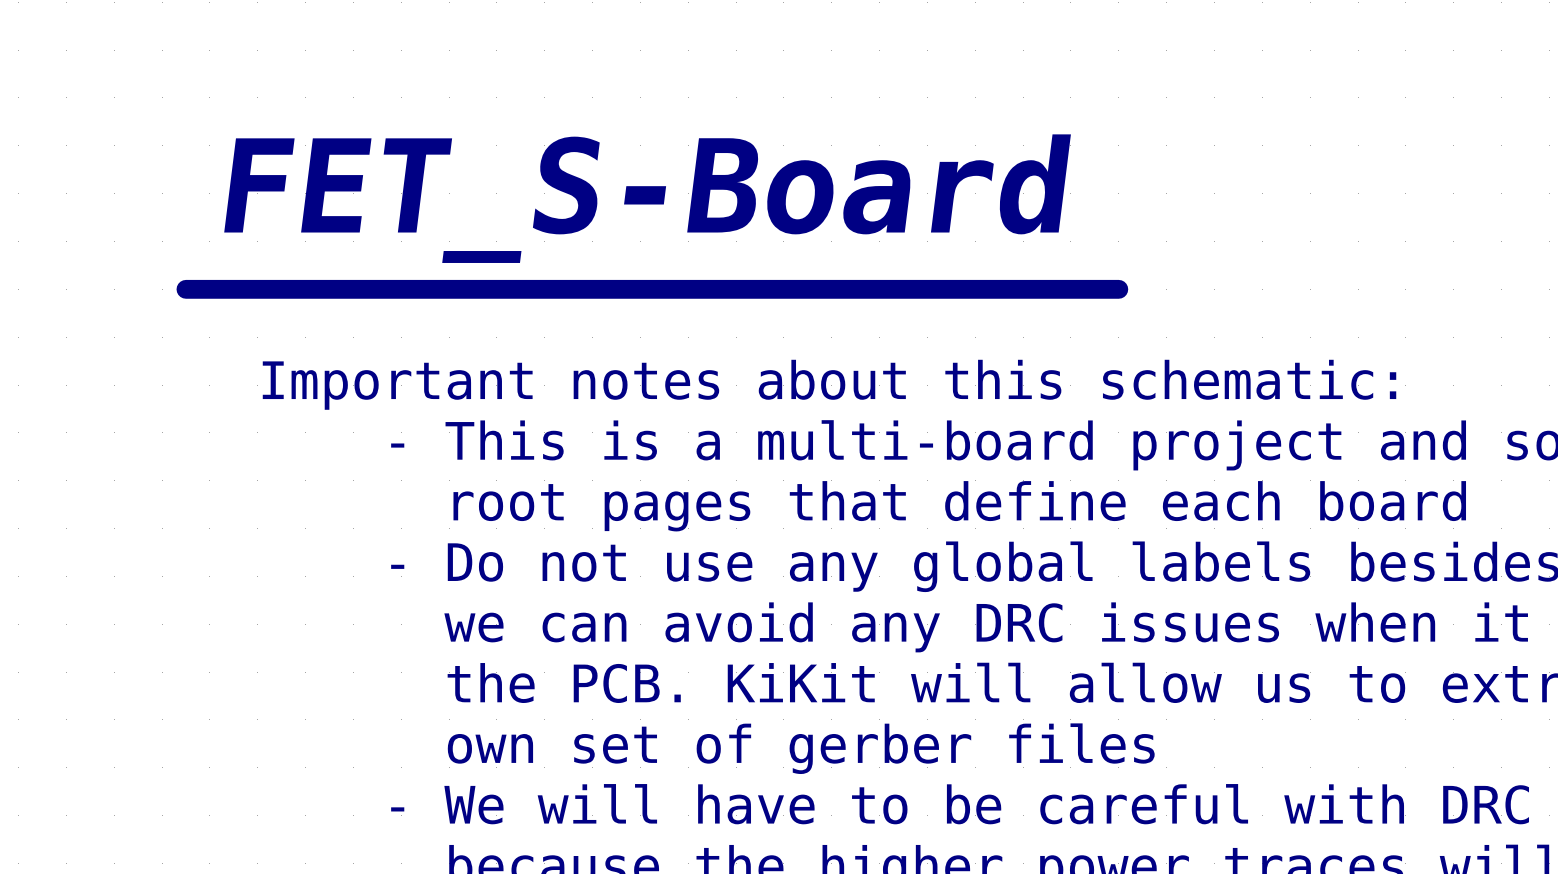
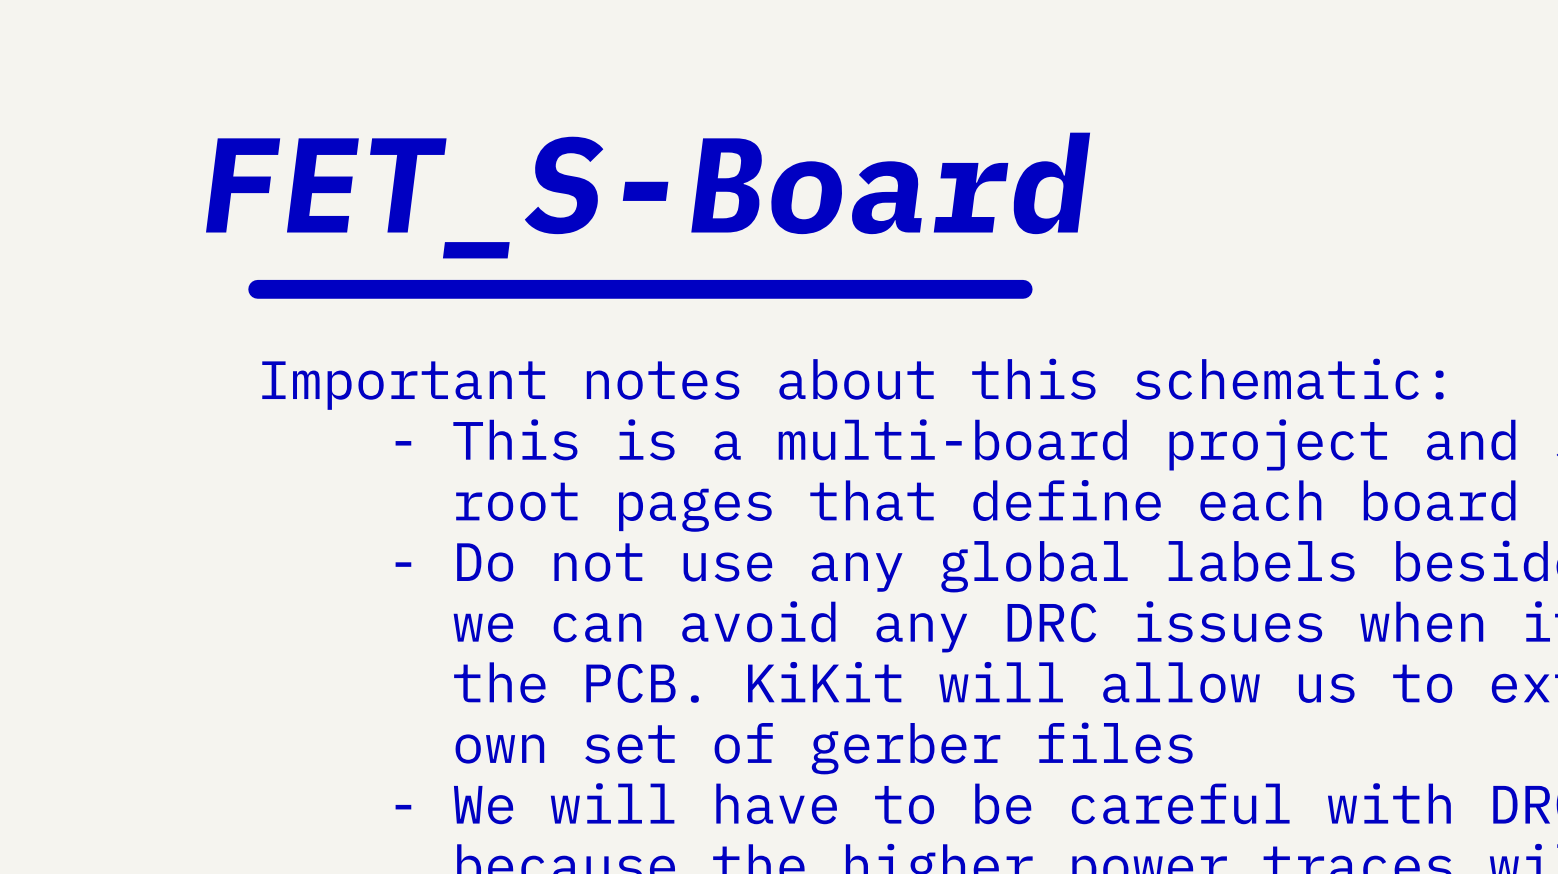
line: (185, 289) (257, 289) -> none
line: (1023, 289) (1118, 289) -> none

